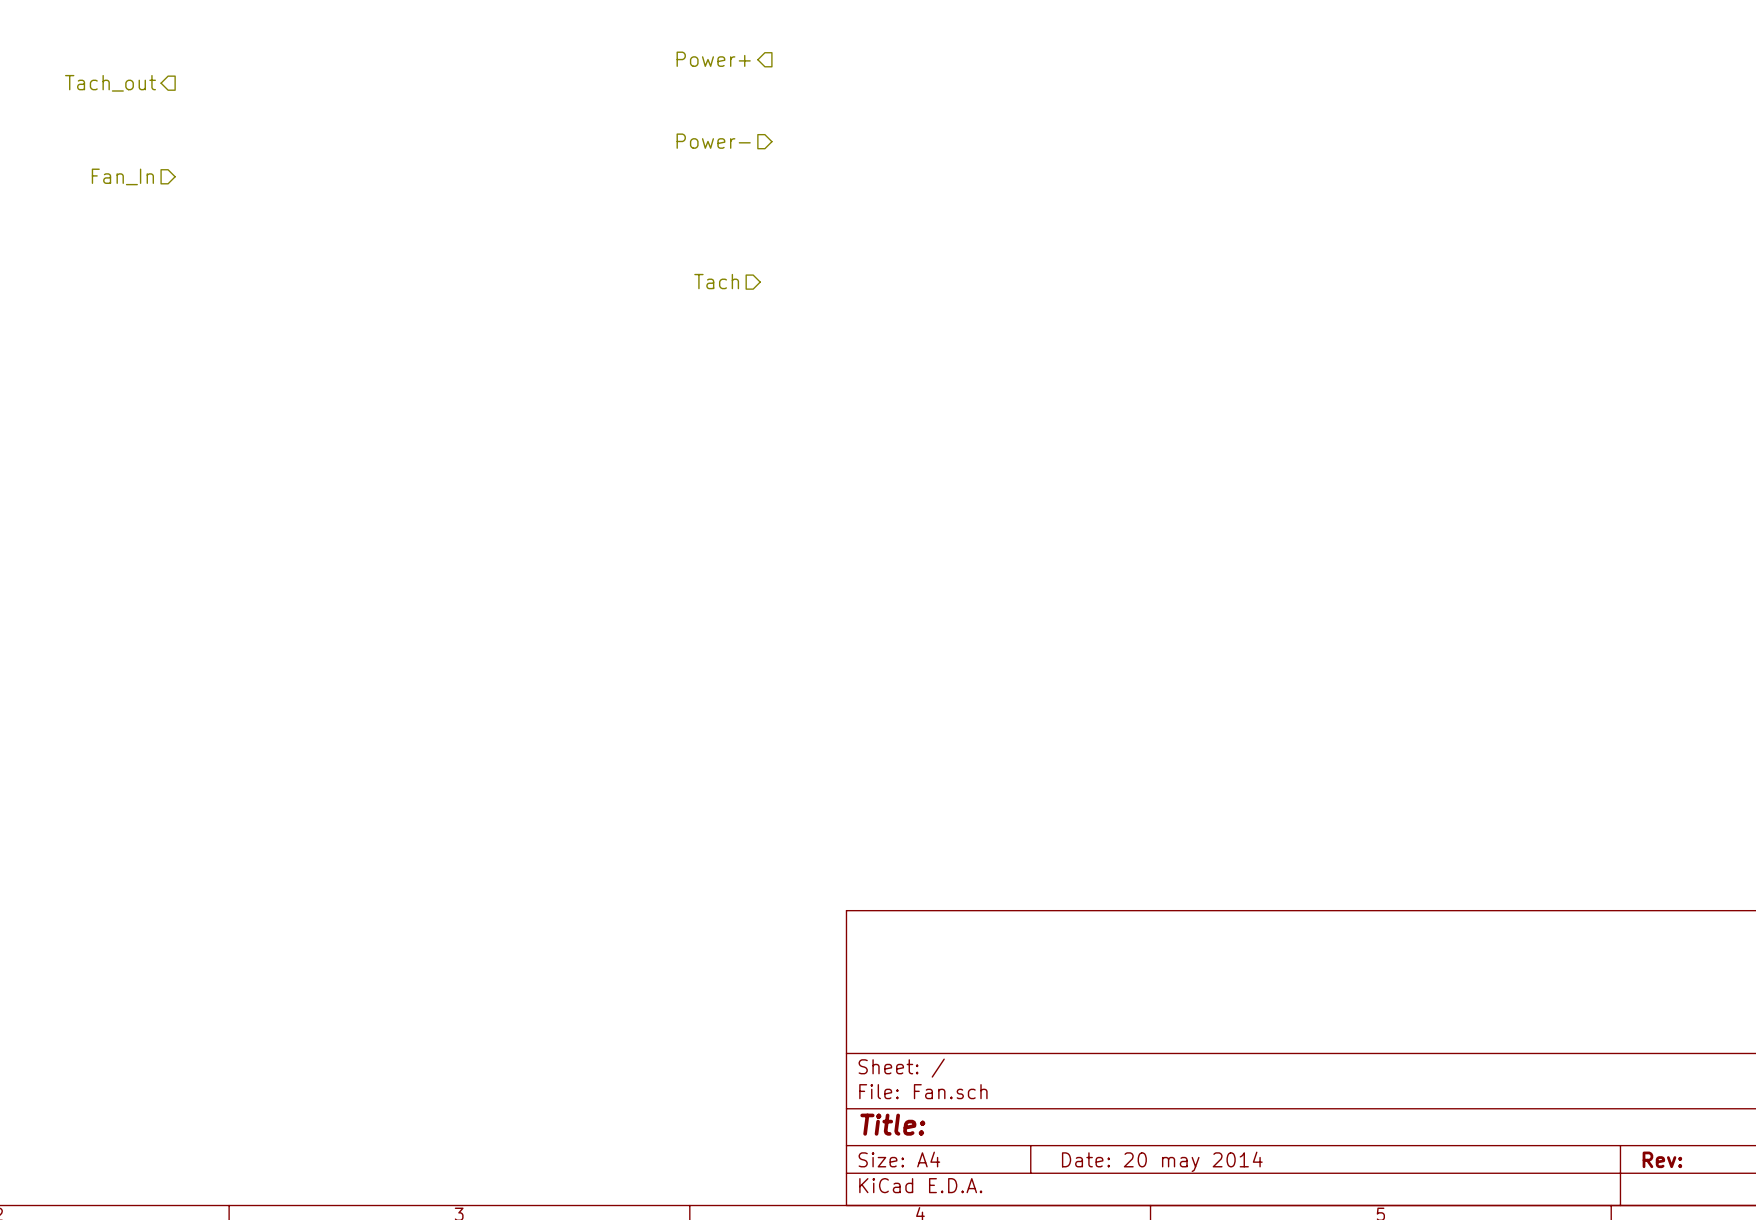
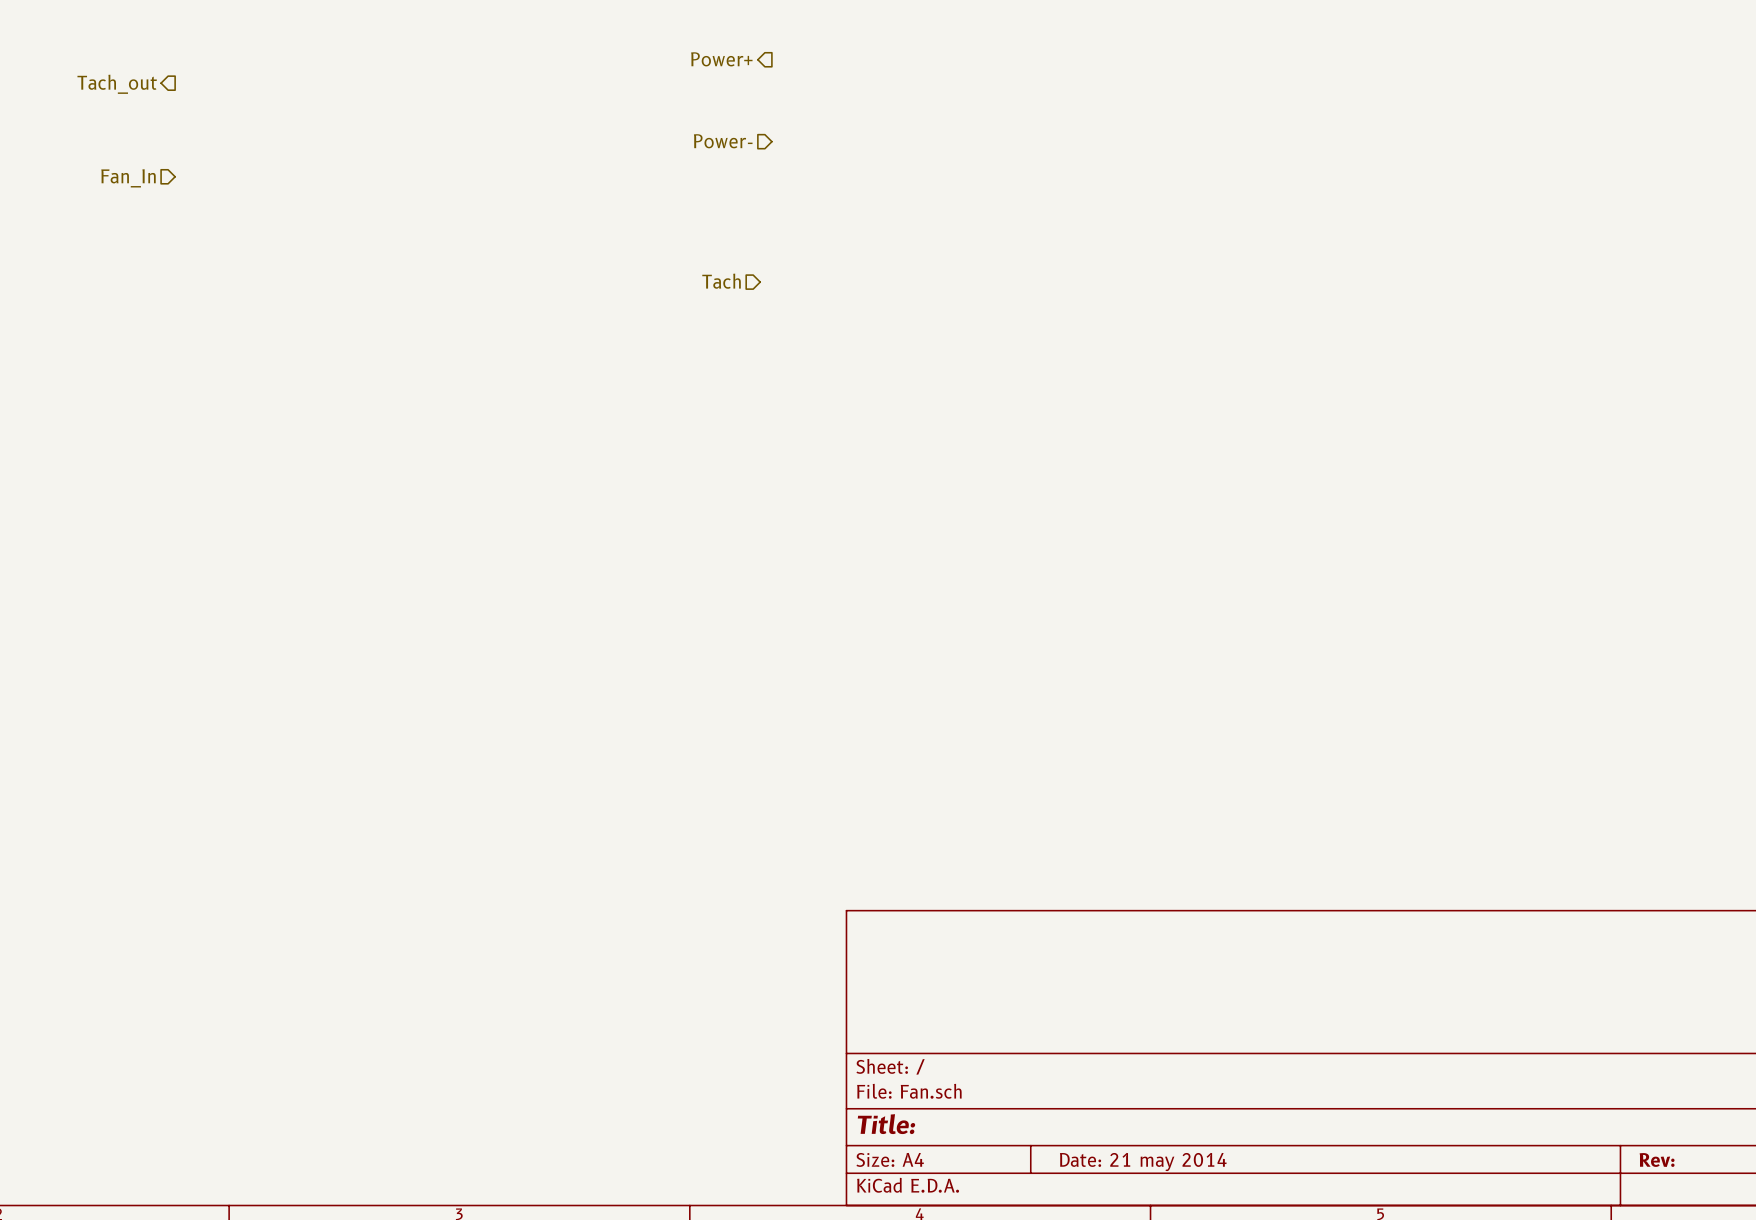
title block: Date: 20 may 2014 (1162, 1161) -> Date: 21 may 2014 (1143, 1162)

